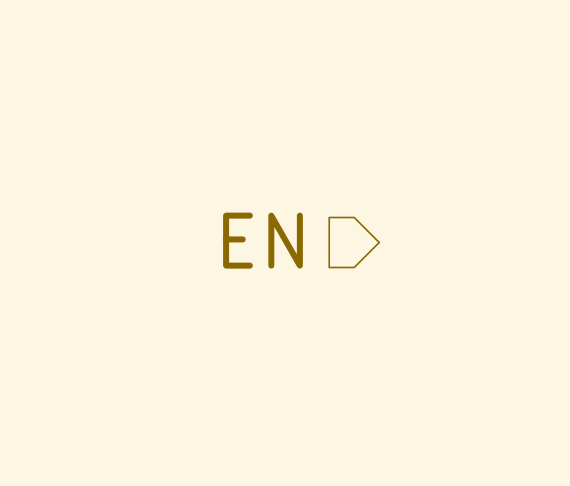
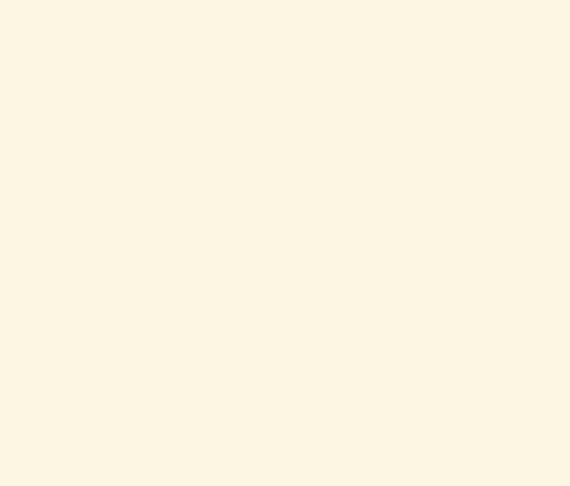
hierarchical label: EN (262, 240) -> none

